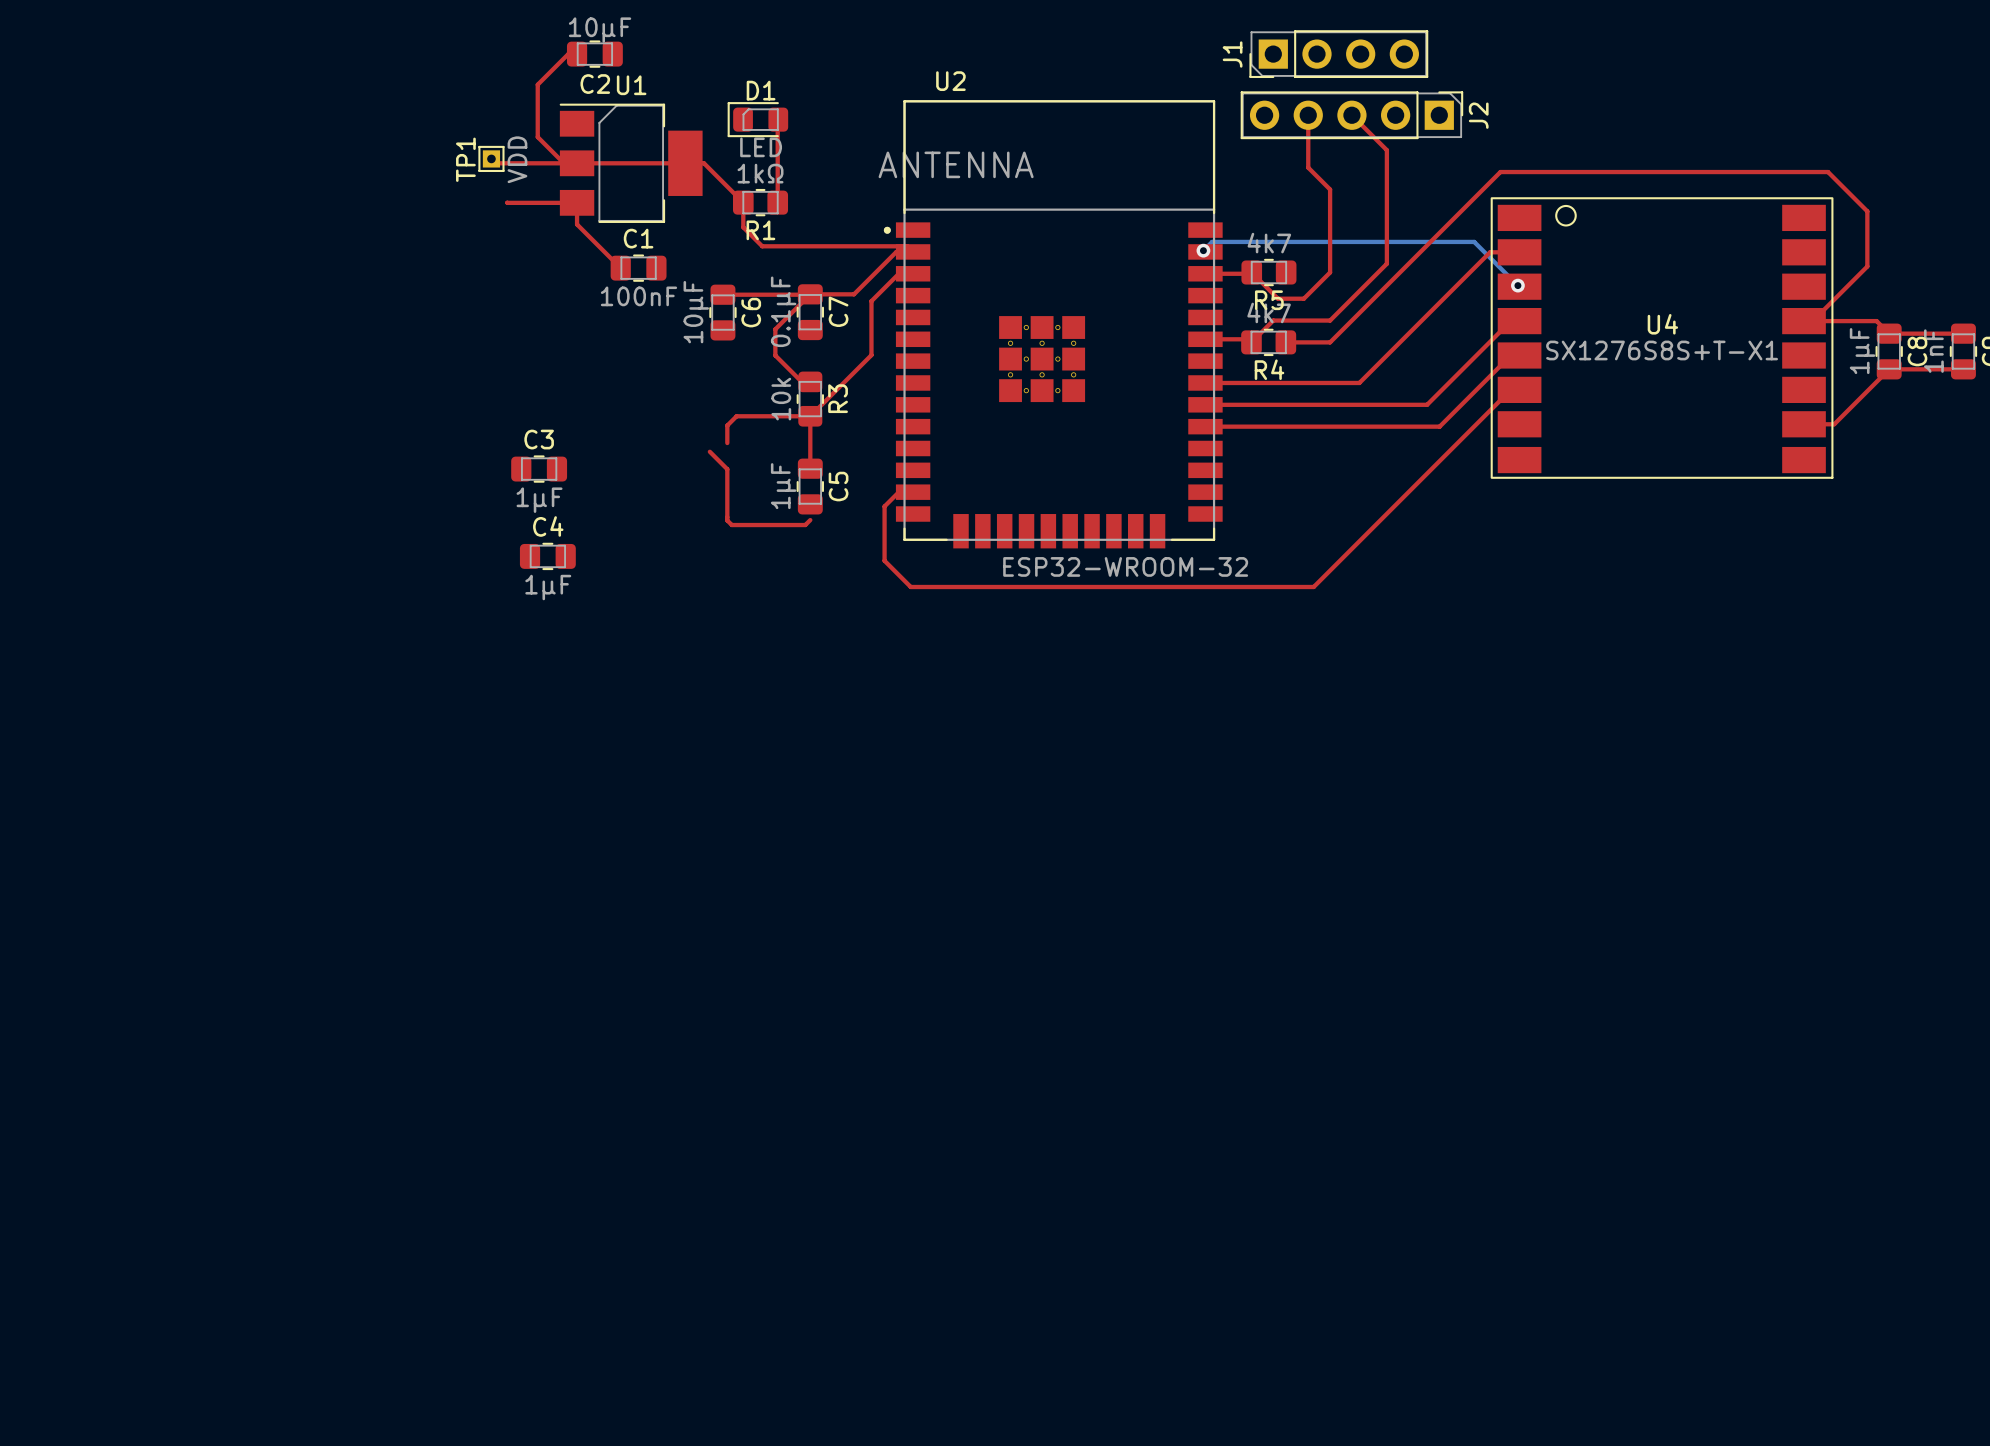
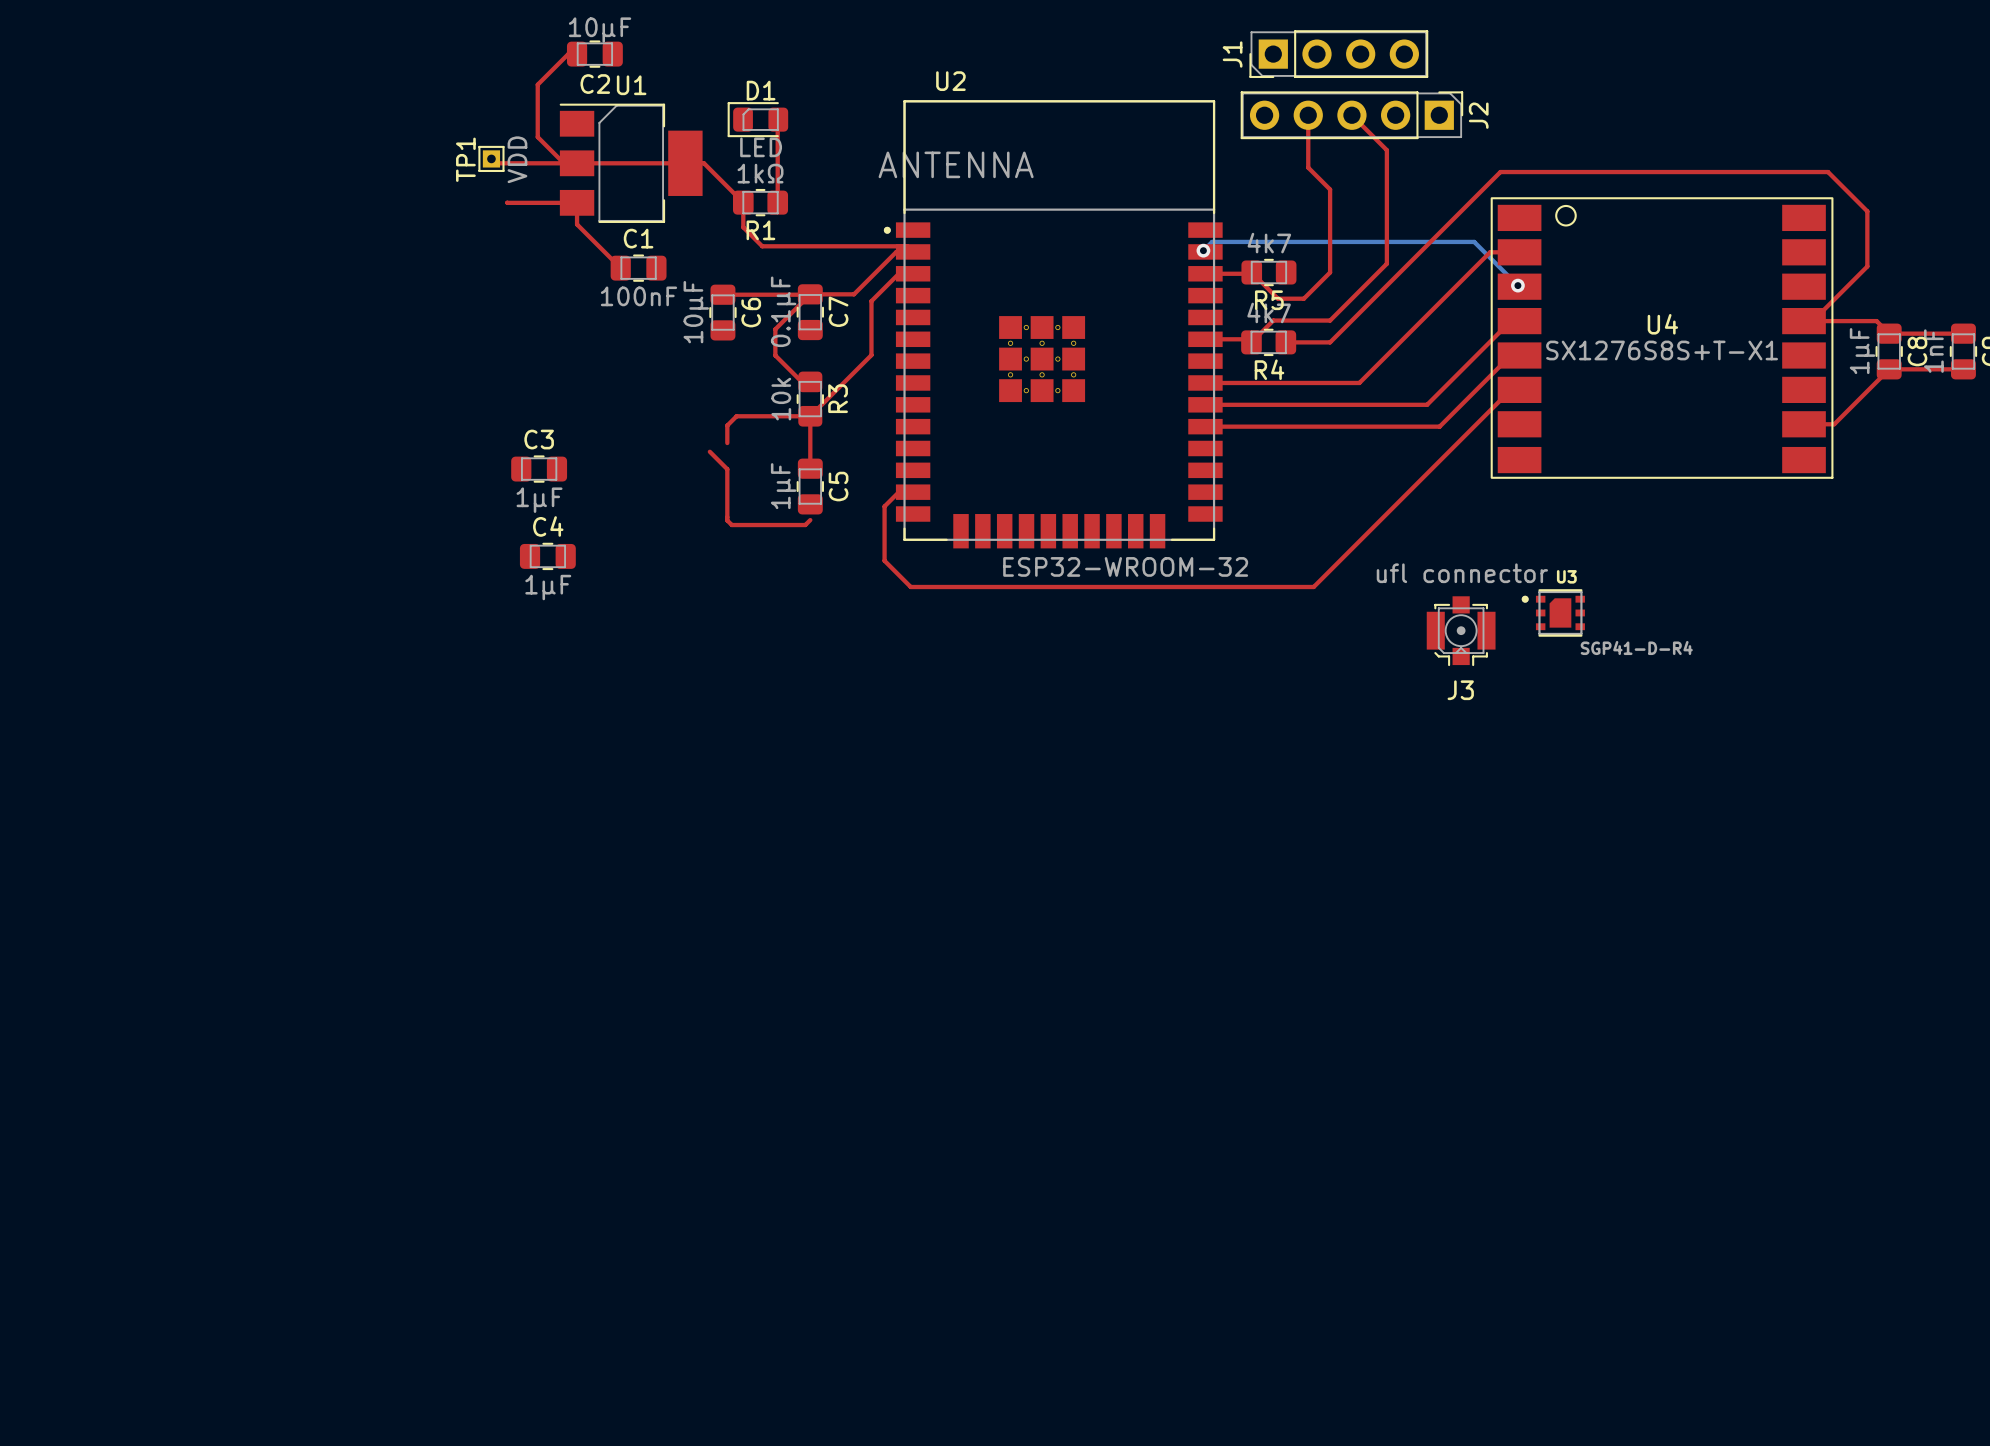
U3: none -> SGP41-D-R4 (1553, 612)
J3: none -> ufl connector (1461, 631)

